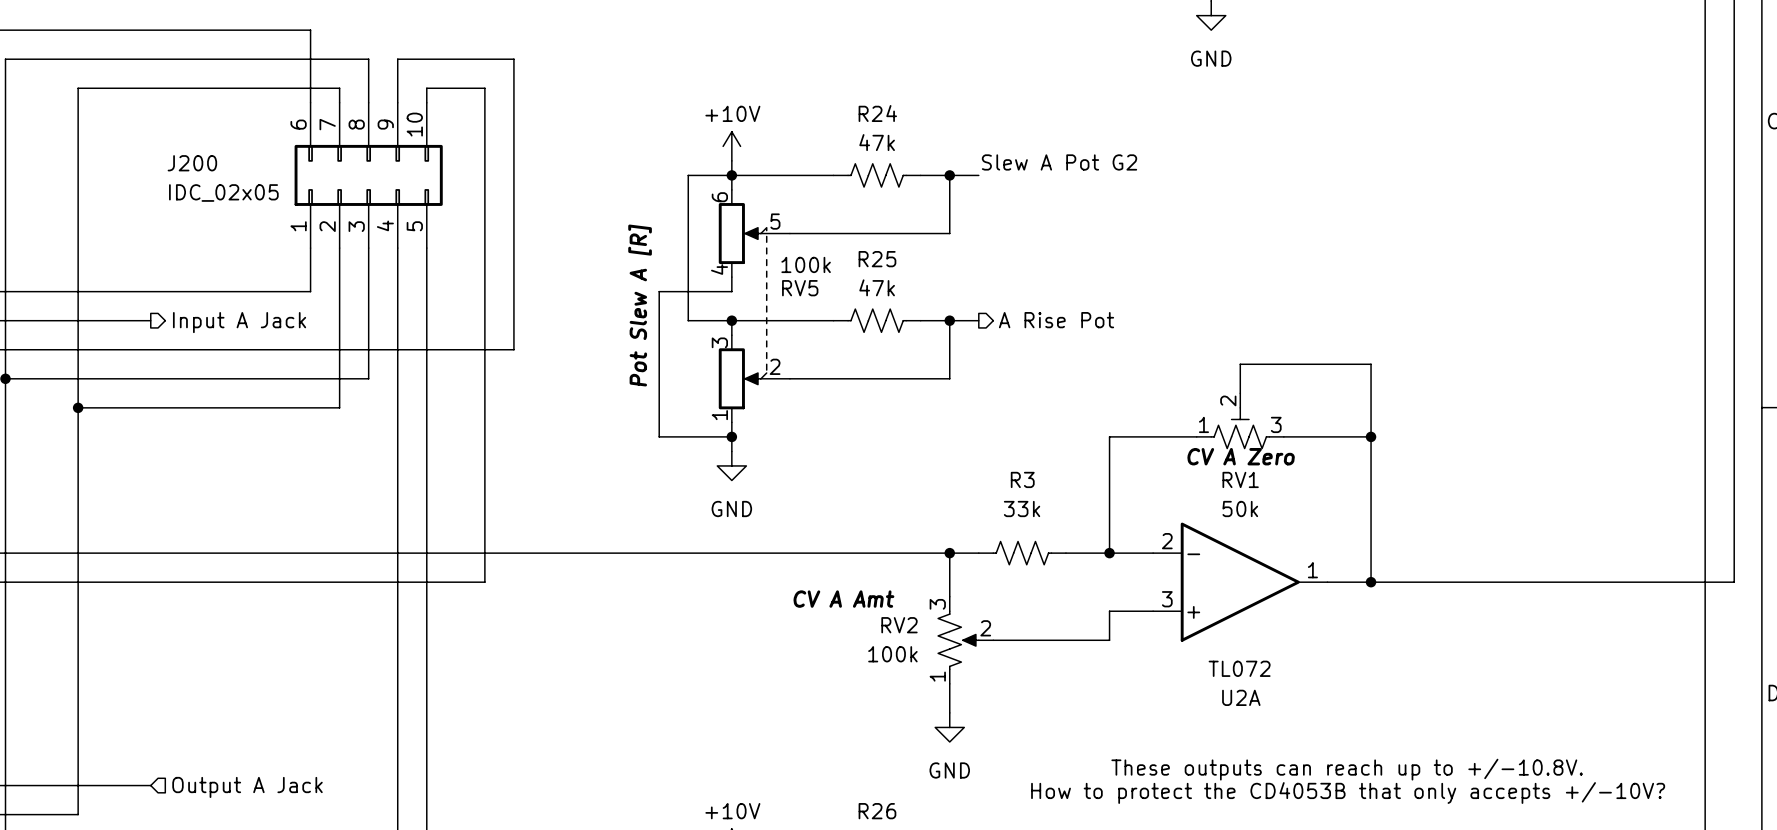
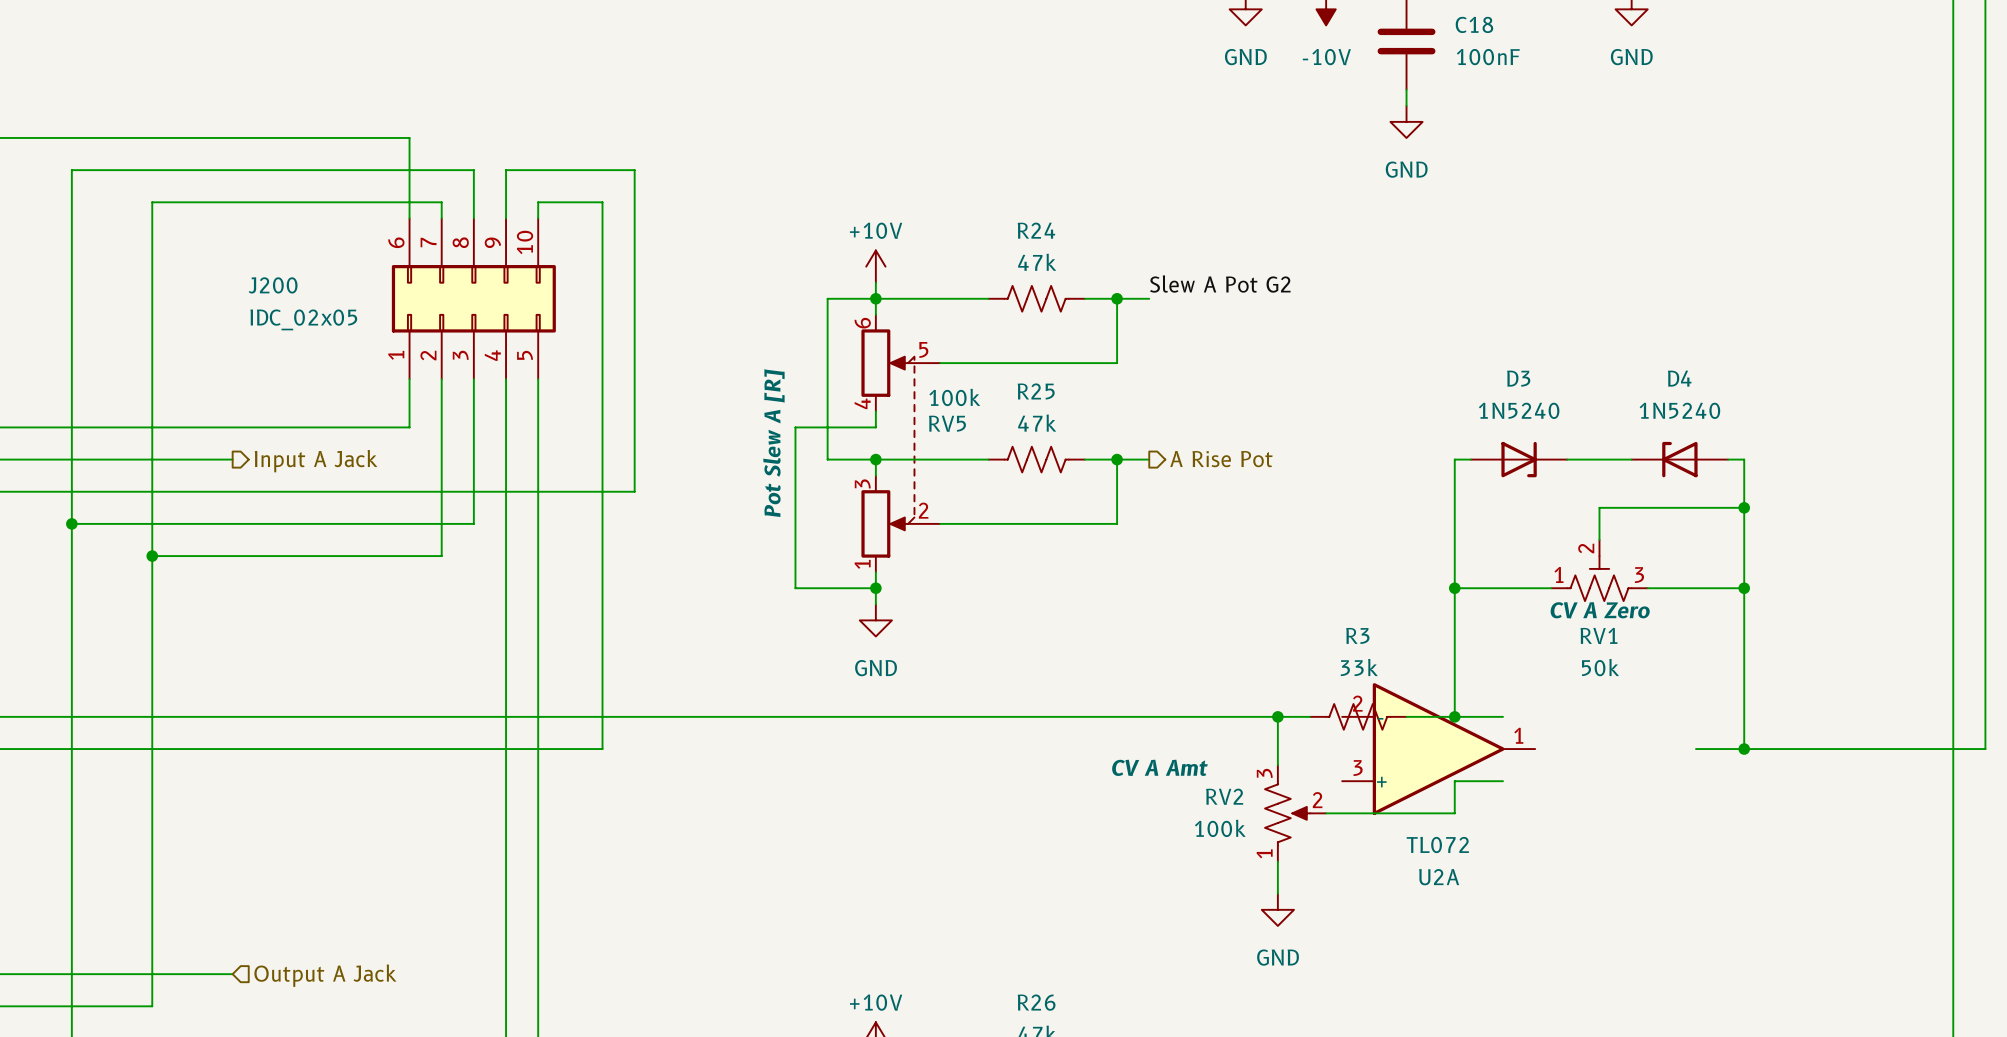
wire: none -> (1470, 459) (1454, 459) (1454, 716)
D3: none -> 1N5240 (1519, 459)
wire: none -> (1567, 459) (1631, 459)
D4: none -> 1N5240 (1679, 459)
wire: none -> (1728, 459) (1744, 459) (1744, 749)
wire: none -> (1744, 507) (1599, 507) (1599, 539)
junction: none -> (1744, 507)
wire: (1240, 393) (1240, 364) (1371, 364) (1371, 582) -> none
RV1 position: (1240, 420) -> (1599, 570)
wire: (1196, 436) (1109, 436) (1109, 553) -> none
junction: none -> (1454, 588)
junction: (1371, 436) -> none
wire: none -> (1647, 588) (1744, 588)
junction: none -> (1744, 588)
wire: (949, 553) (949, 596) -> (1277, 716) (1277, 765)
junction: (949, 553) -> none
R3 position: (1022, 553) -> (1358, 716)
junction position: (1109, 553) -> (1277, 716)
wire: none -> (1406, 716) (1503, 716)
junction: none -> (1454, 716)
wire: (1327, 582) (1472, 582) -> none
junction: (1371, 582) -> none
junction: none -> (1744, 749)
wire: (1153, 611) (1109, 611) (1109, 640) (993, 640) -> (1503, 781) (1454, 781) (1454, 813) (1326, 813)
RV2 position: (965, 640) -> (1295, 813)
wire: (949, 683) (949, 712) -> (1277, 861) (1277, 893)
power symbol position: GND (949, 727) -> GND (1277, 909)
text: These outputs can reach up to +/-10.8V. (1347, 769) -> none
text: How to protect the CD4053B that only accepts +/-10V? (1348, 793) -> none

